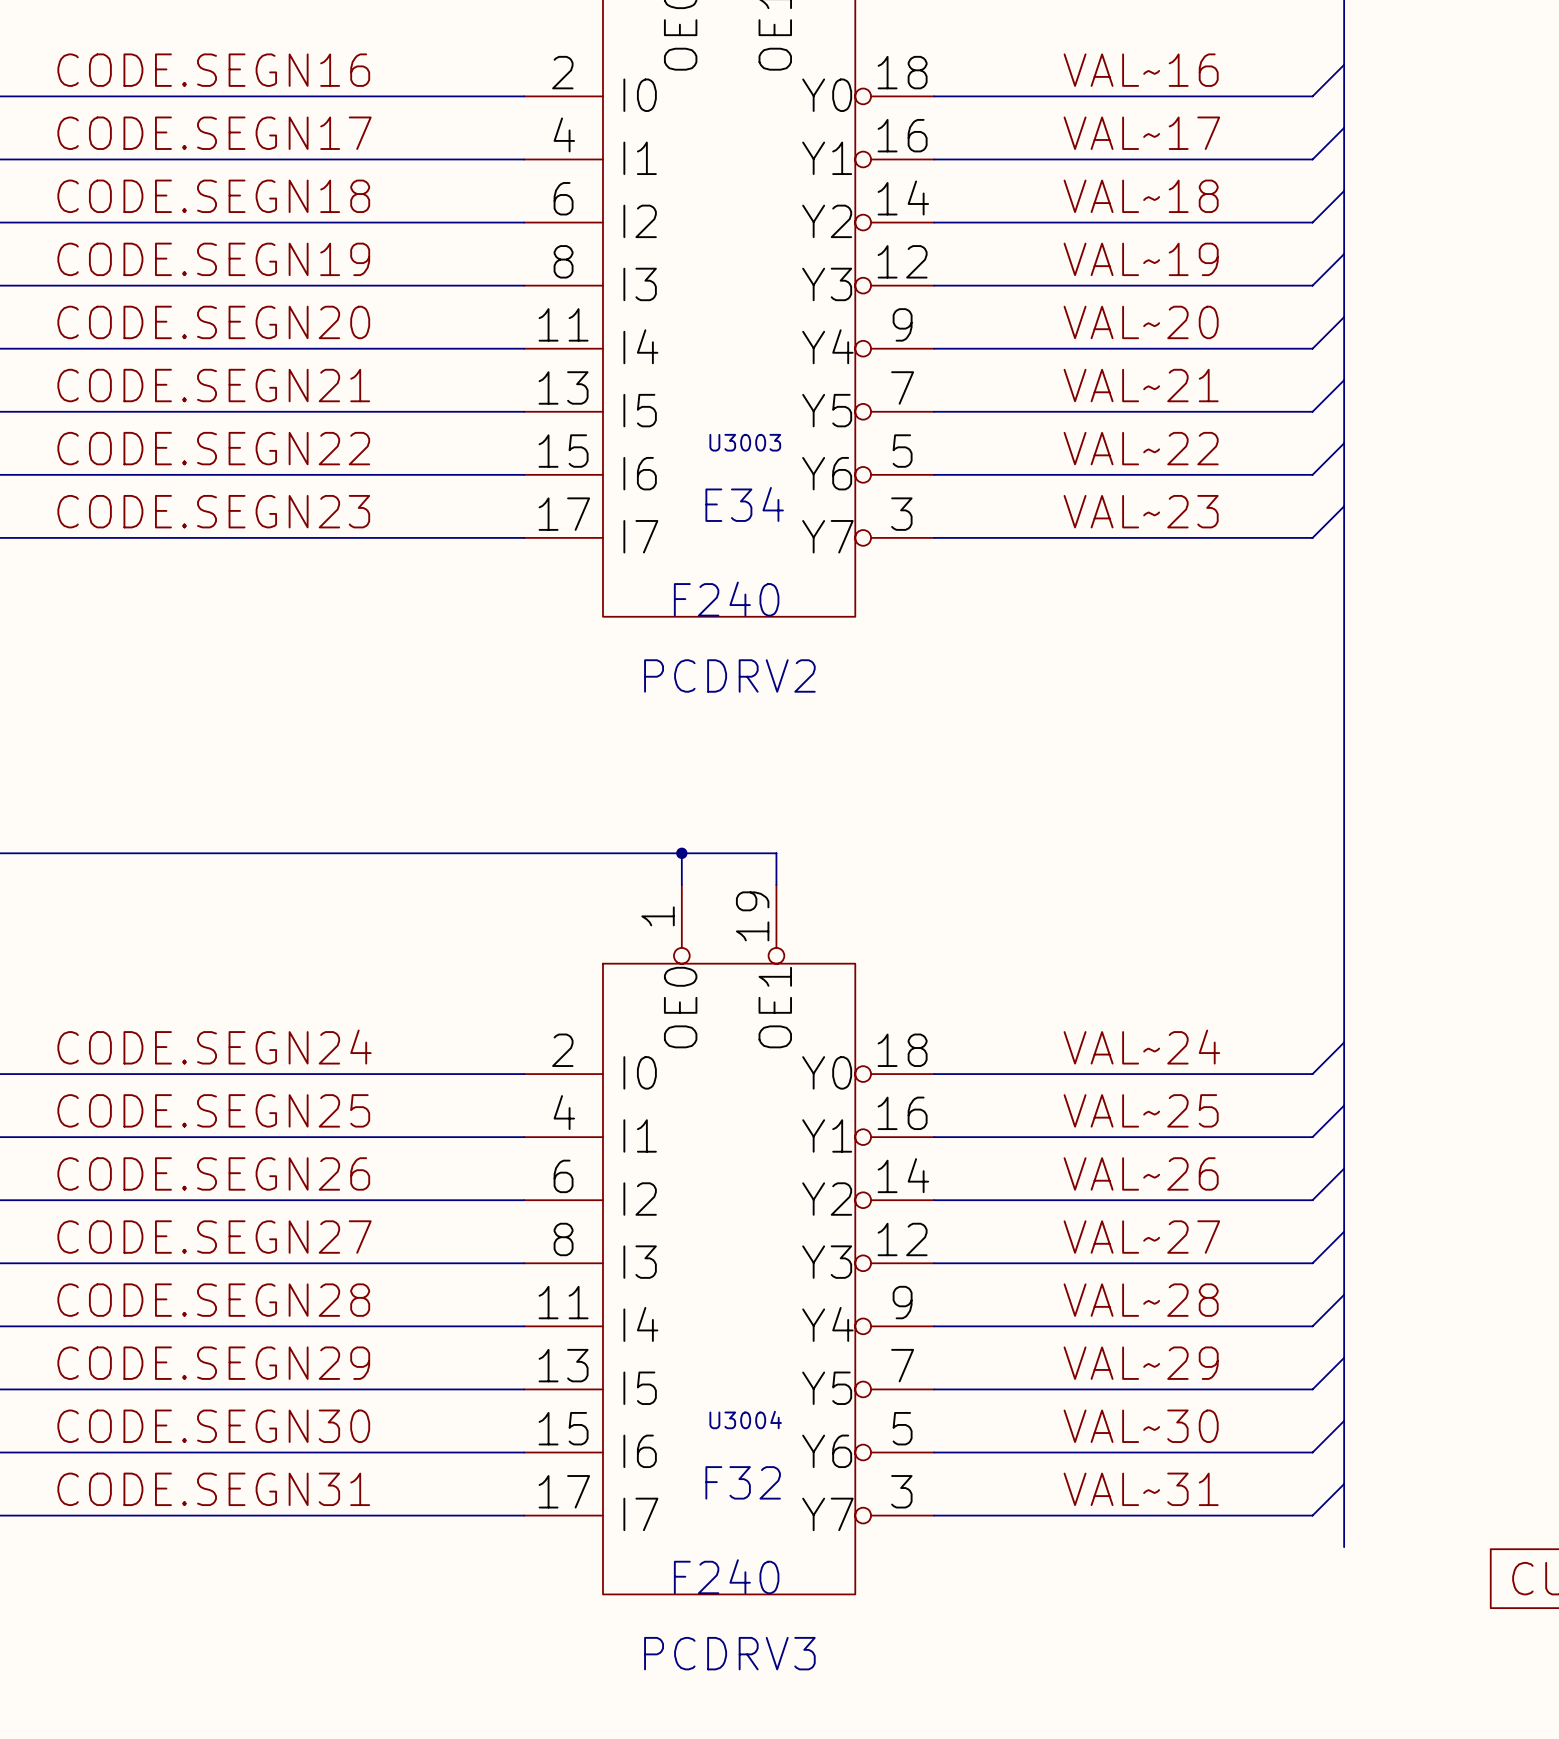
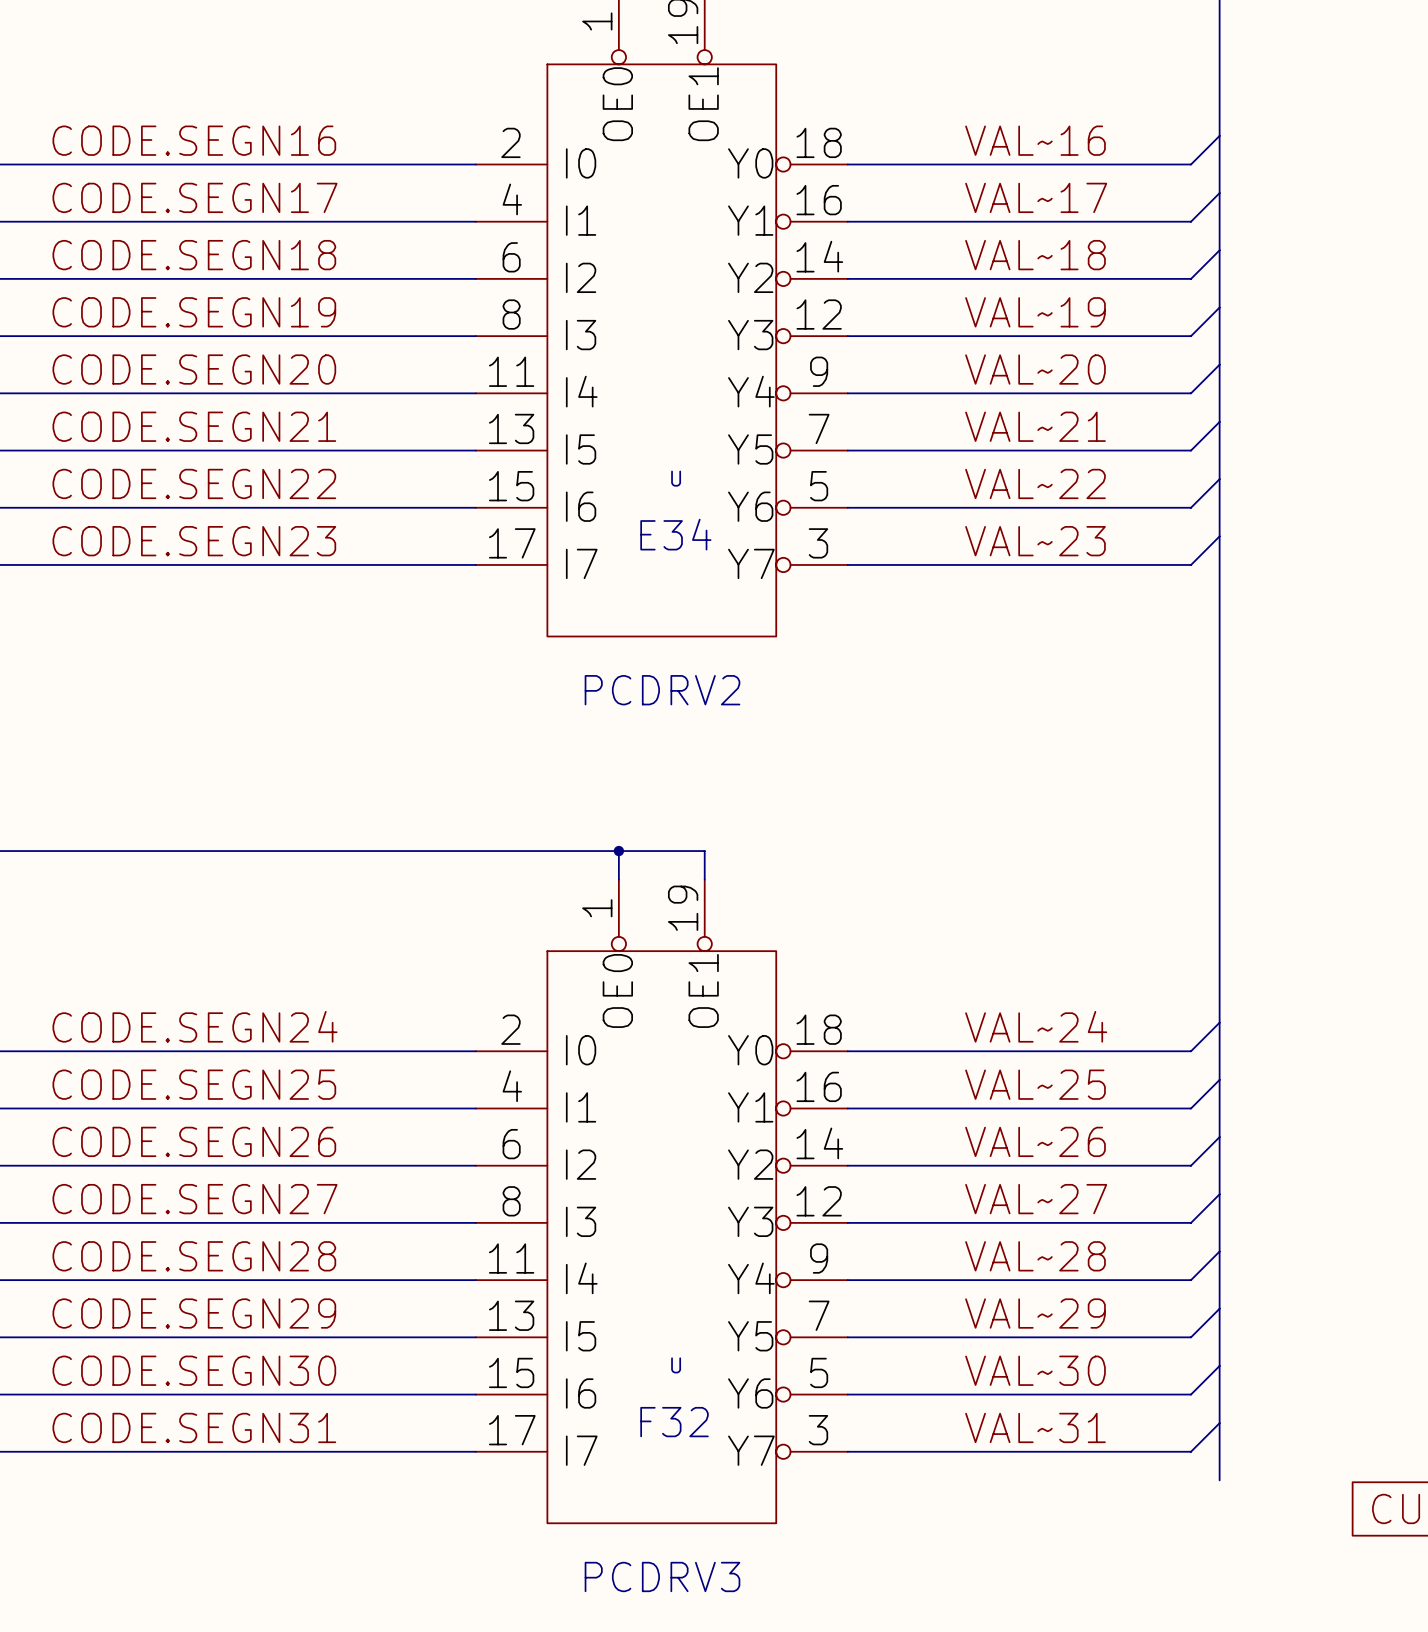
U3003 name: U3003 (745, 442) -> U (676, 478)
U3003 value: F240 (726, 599) -> none
U3004 name: U3004 (745, 1420) -> U (676, 1365)
U3004 value: F240 (726, 1576) -> none

